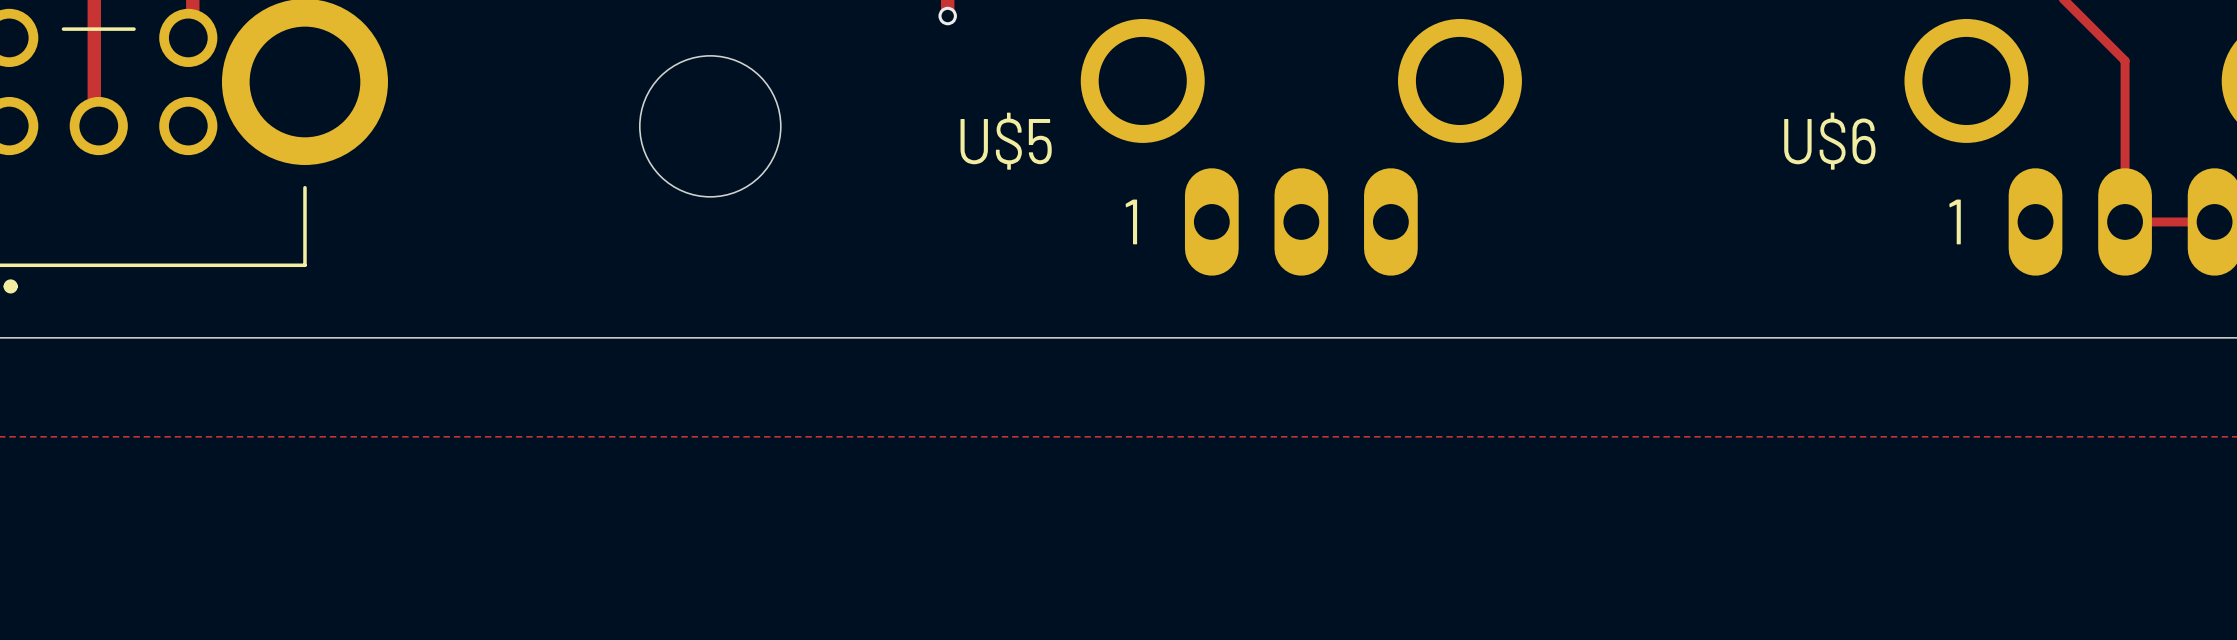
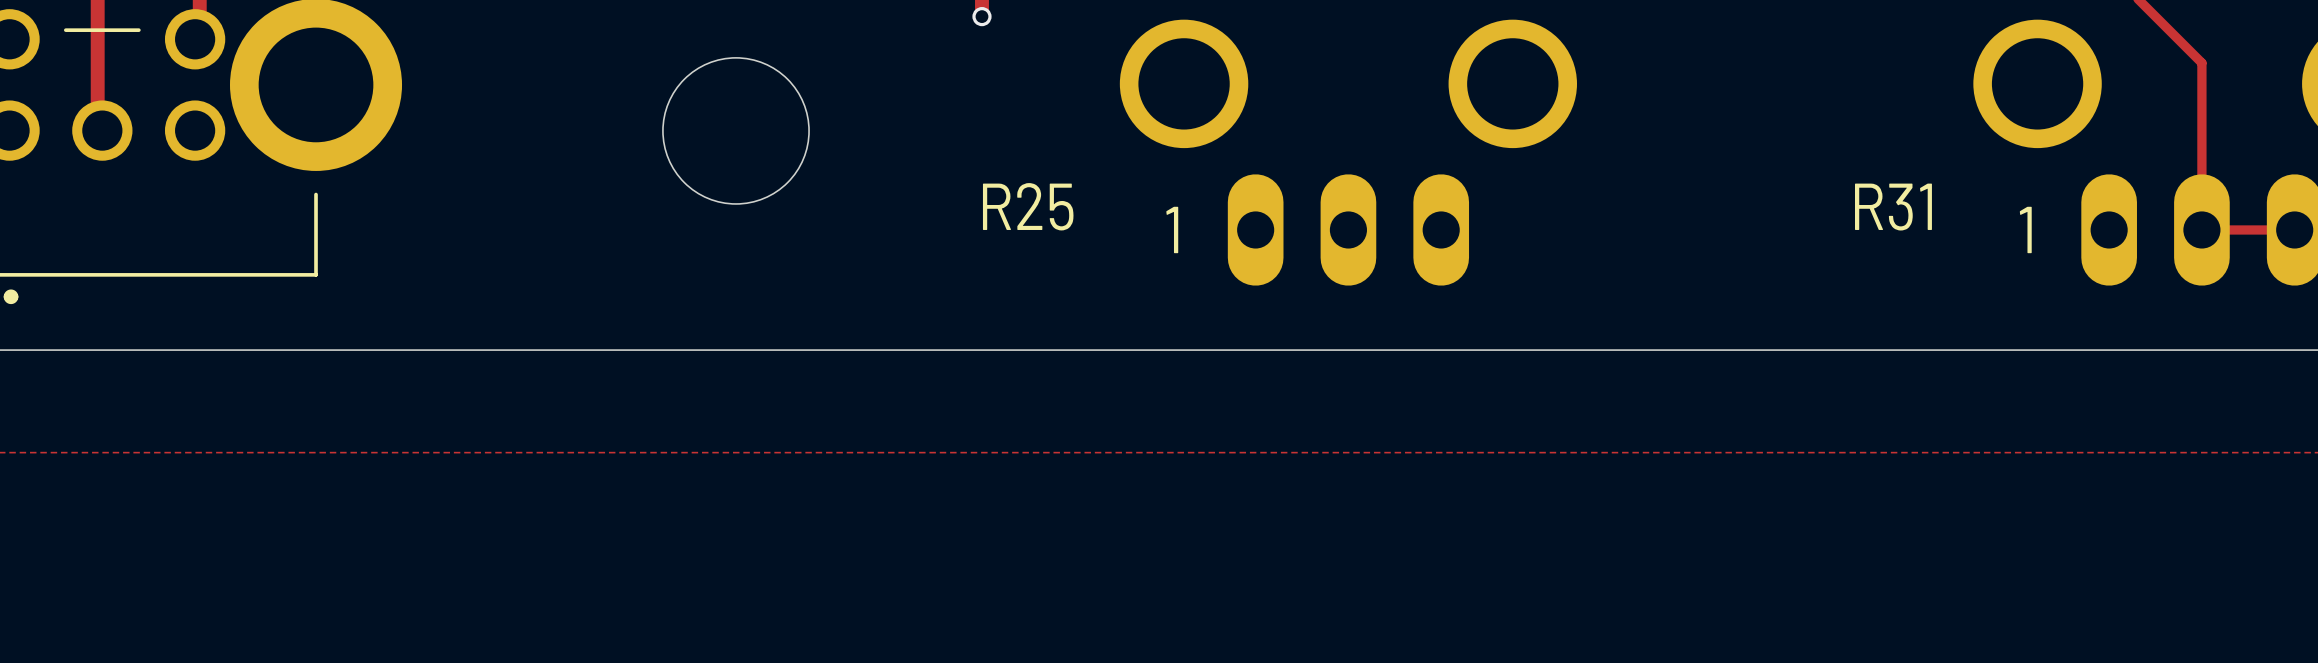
U$5 name: U$5 (1006, 141) -> R25 (1028, 206)
U$6 name: U$6 (1829, 141) -> R31 (1893, 207)

